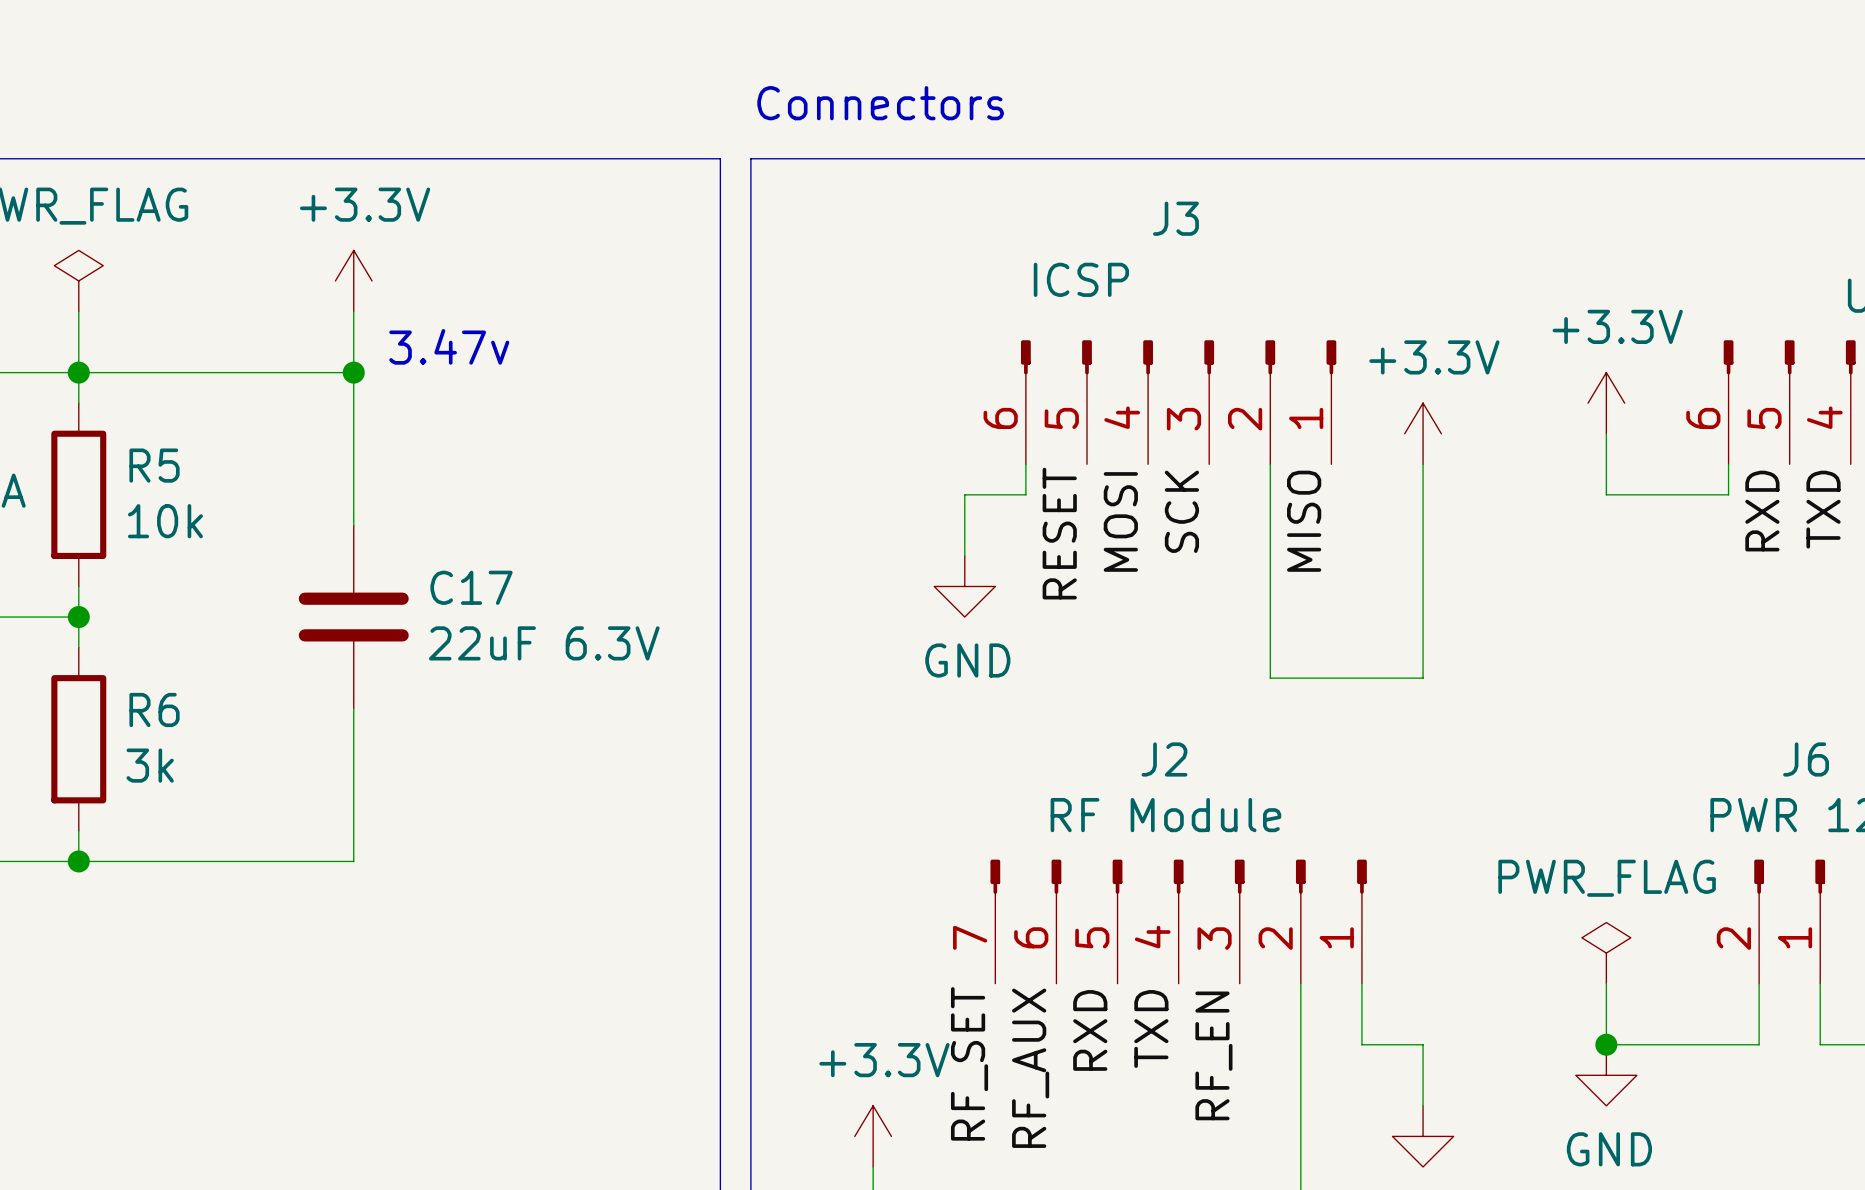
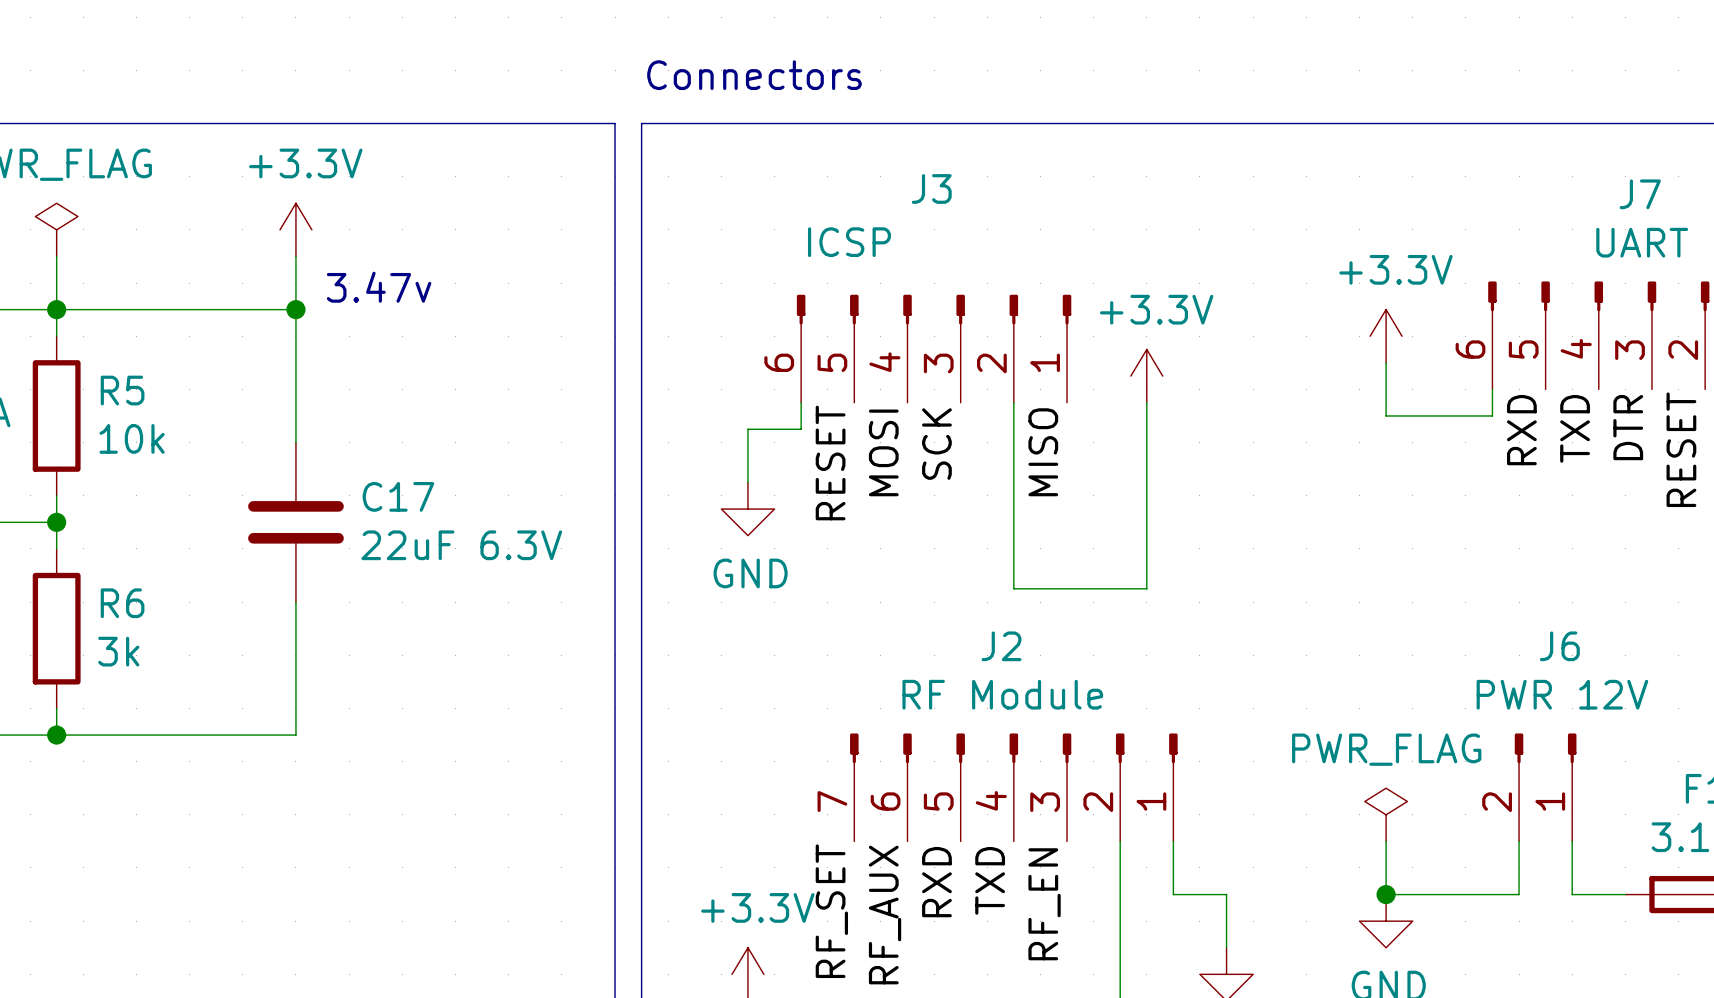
J3 position: (1178, 402) -> (934, 348)
power symbol position: +3.3V (1423, 433) -> +3.3V (1146, 376)
wire: (1025, 464) (1025, 494) (964, 494) (964, 555) -> (801, 402) (801, 429) (747, 429) (747, 482)
wire: (1270, 464) (1270, 678) (1423, 678) (1423, 464) -> (1013, 402) (1013, 588) (1146, 588) (1146, 402)
label position: SCK (1181, 511) -> SCK (936, 444)
label position: MOSI (1120, 521) -> MOSI (883, 452)
label position: MISO (1304, 521) -> MISO (1043, 452)
label position: RESET (1059, 533) -> RESET (830, 463)
power symbol position: GND (964, 586) -> GND (747, 509)

